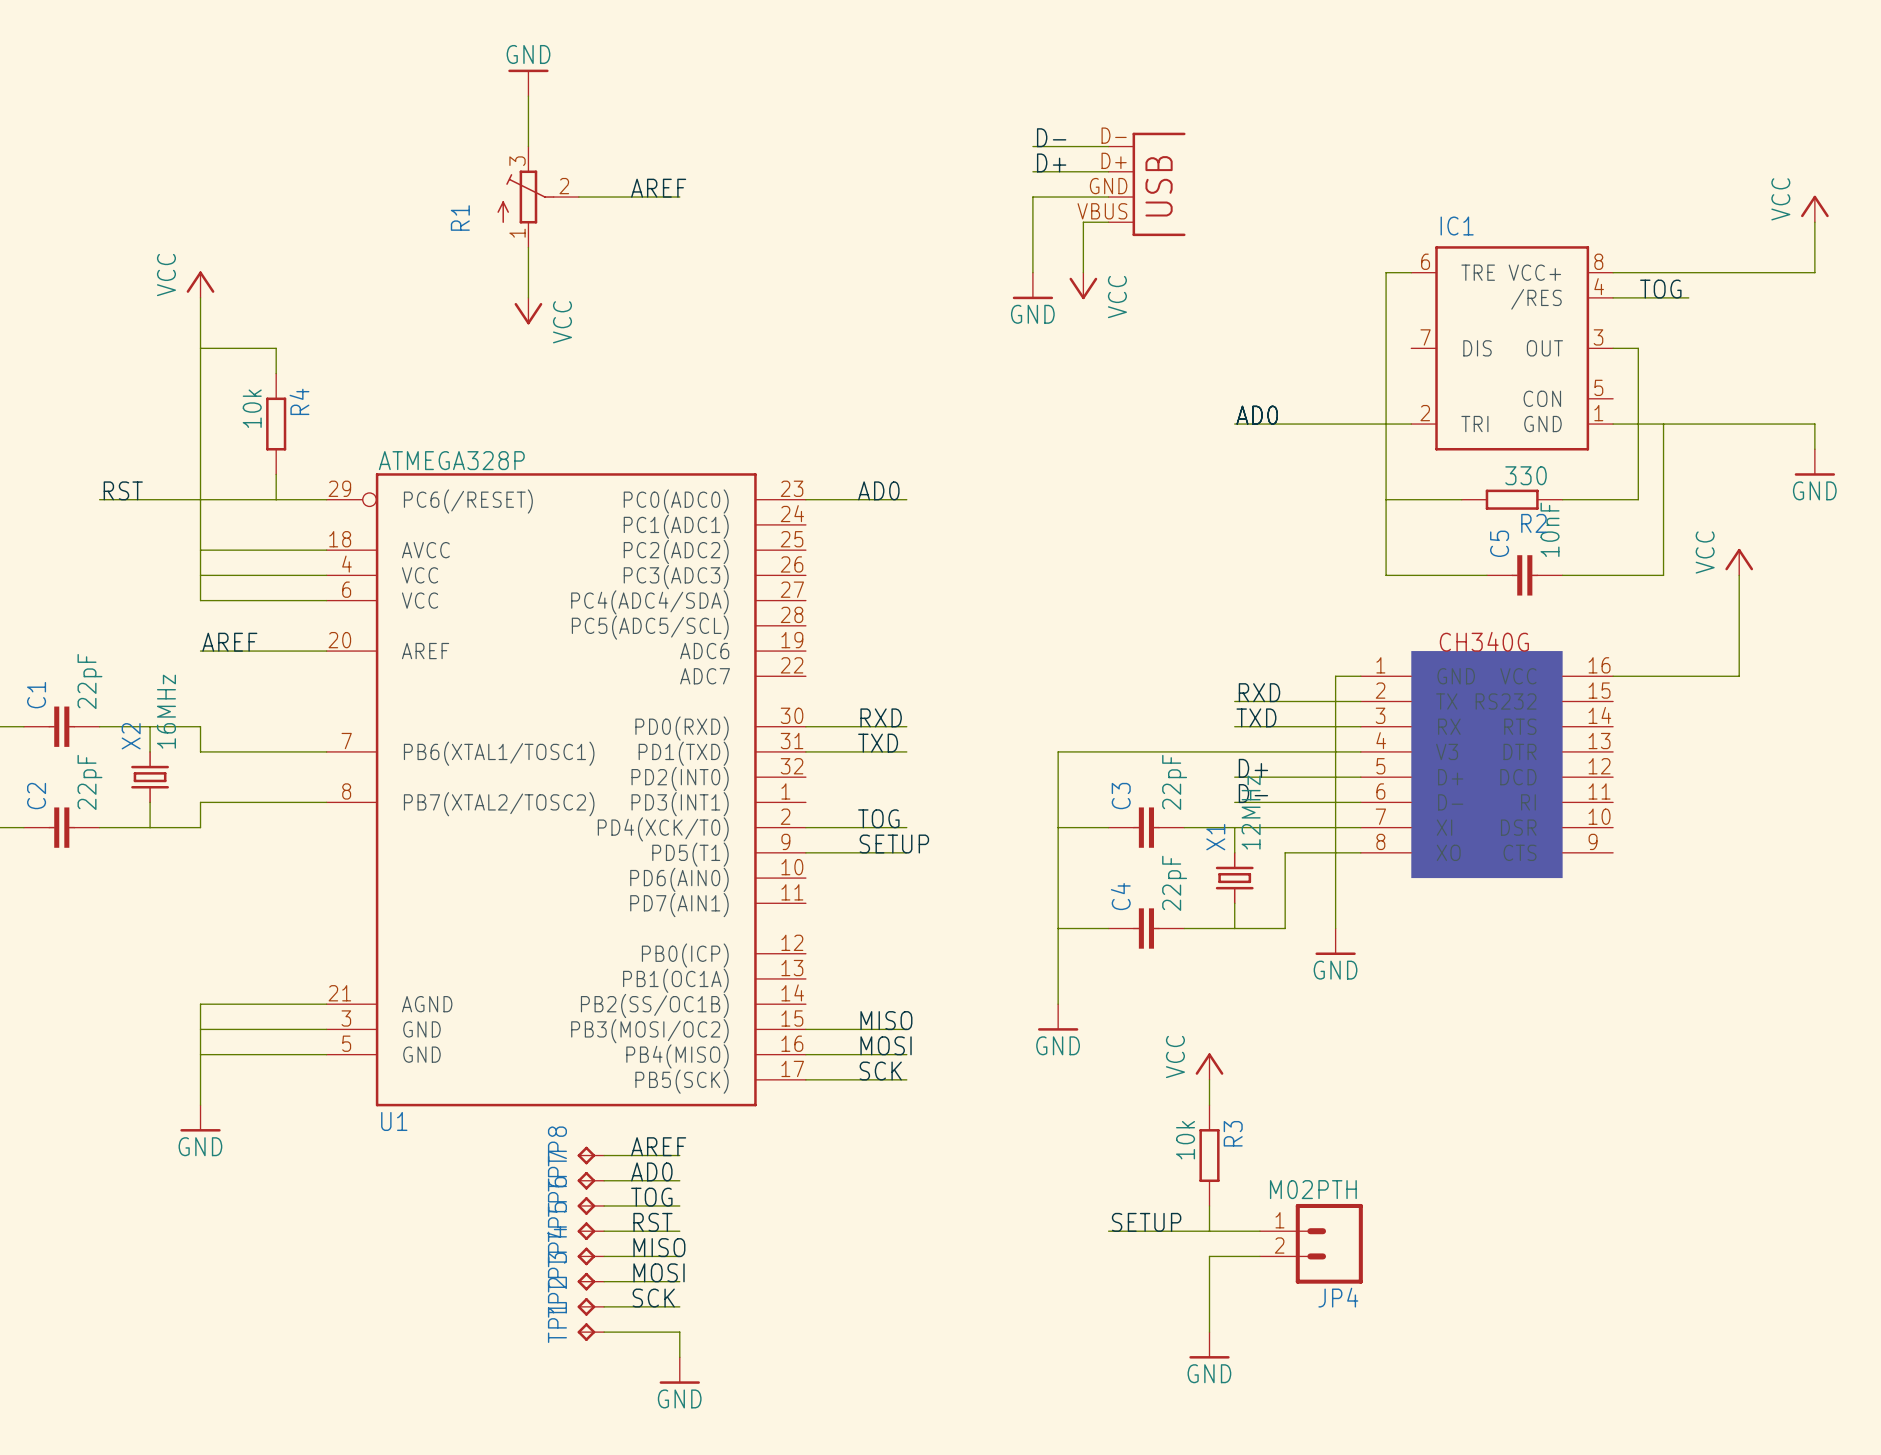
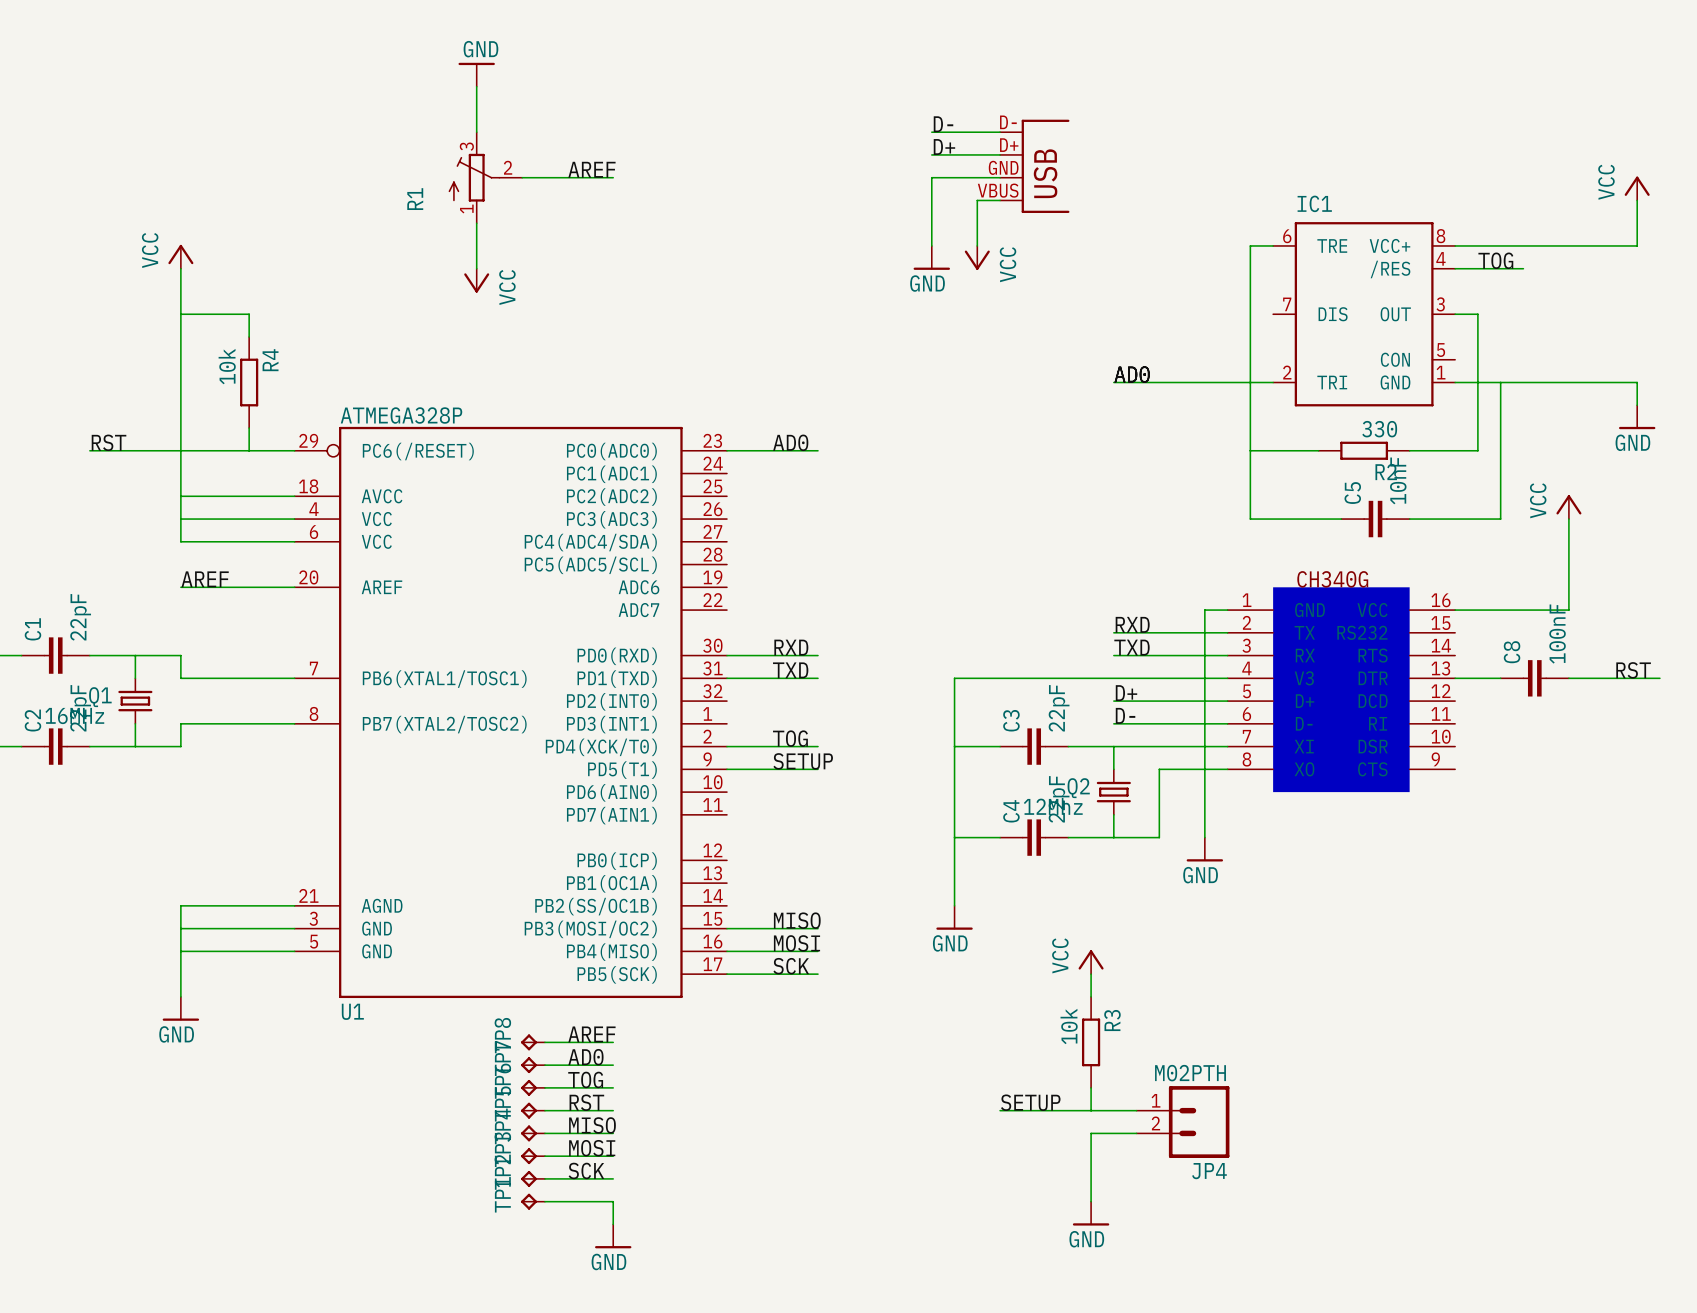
X2 value rotation: 0° (166, 711) -> 90° clockwise (74, 716)
X2 value position: 16MHz (166, 711) -> 16MHz (74, 716)
X2 name: X2 (131, 736) -> Q1 (100, 697)
label: none -> RST (1633, 670)
wire: none -> (1455, 678) (1500, 678)
C8: none -> 100nF (1534, 678)
wire: none -> (1568, 678) (1659, 678)
X1 value: 12MHz (1251, 812) -> 12Mhz (1053, 806)
X1 name: X1 (1215, 837) -> Q2 (1078, 788)

